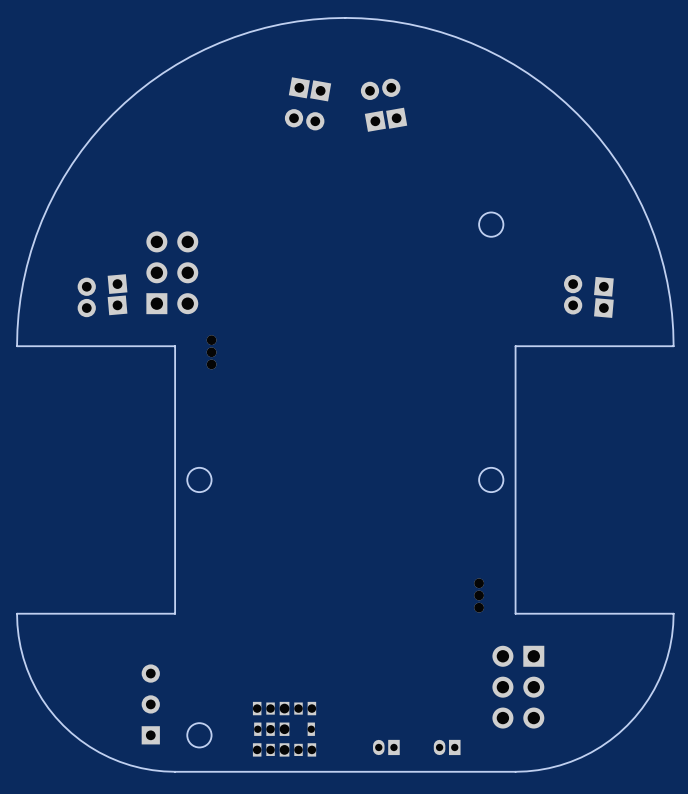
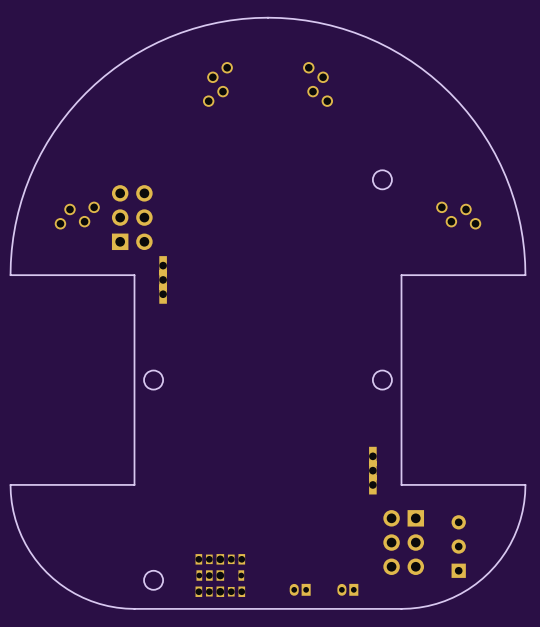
part footprint: [284, 77, 310, 128] -> [217, 62, 233, 98]
part footprint: [382, 78, 408, 129] -> [303, 62, 319, 98]
part: (318, 105) -> none
part: (373, 106) -> none
part: none -> (210, 89)
part: none -> (325, 89)
part: none -> (82, 208)
part: none -> (453, 208)
part footprint: [77, 274, 128, 296] -> [54, 215, 91, 230]
part footprint: [564, 274, 614, 297] -> [445, 215, 482, 230]
part: (102, 306) -> none
part: (588, 307) -> none
part footprint: [206, 335, 217, 370] -> [159, 256, 167, 304]
part footprint: [474, 578, 484, 613] -> [369, 446, 377, 495]
part: none -> (458, 546)
part: (150, 704) -> none

